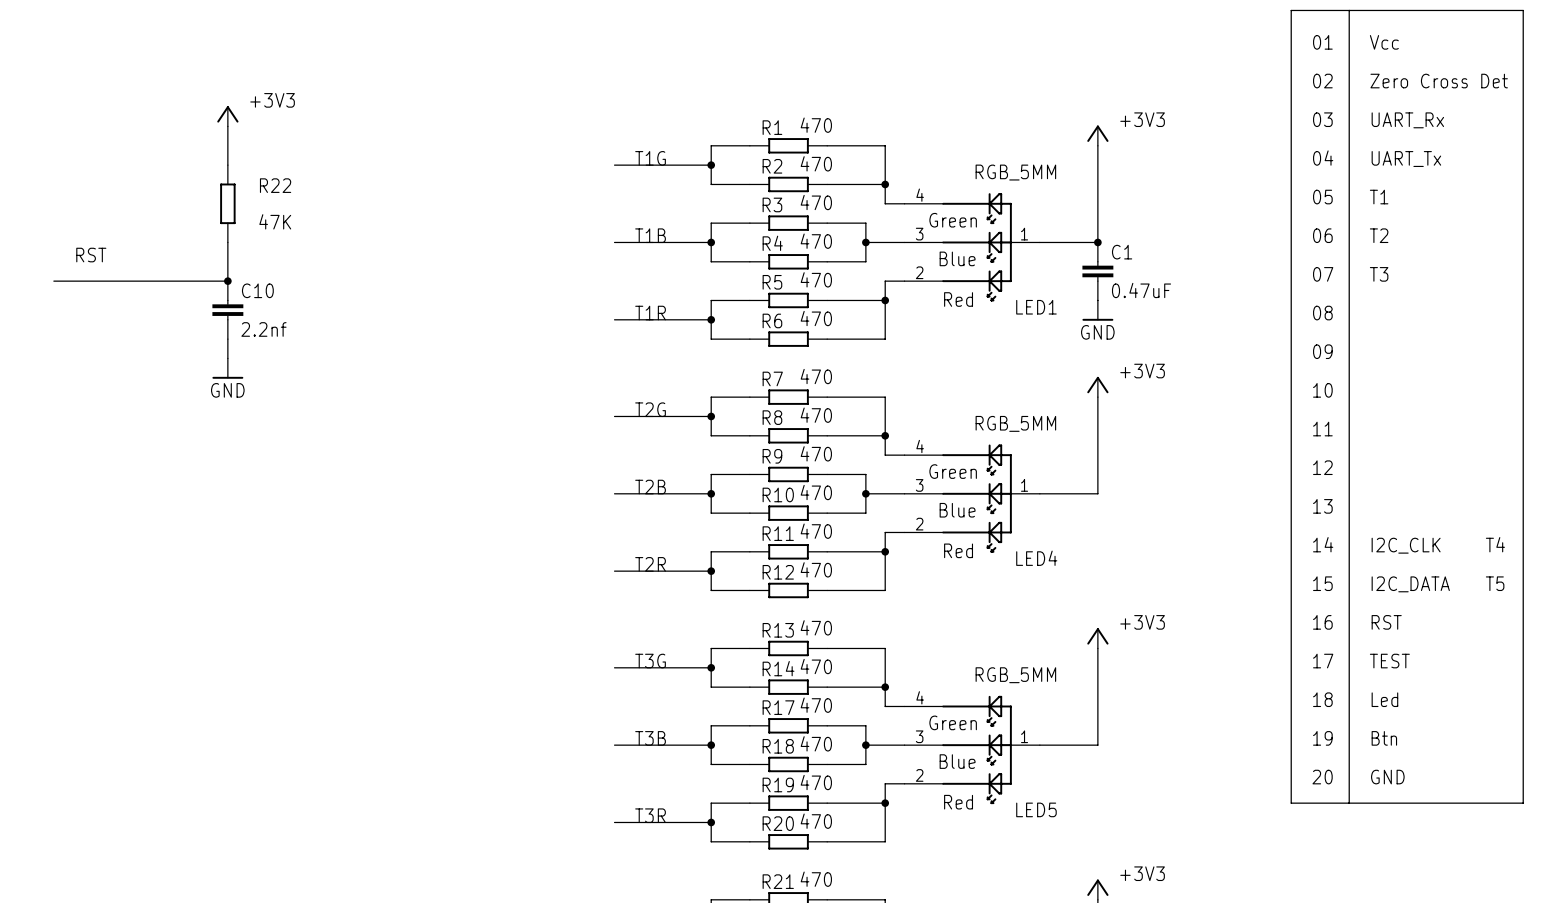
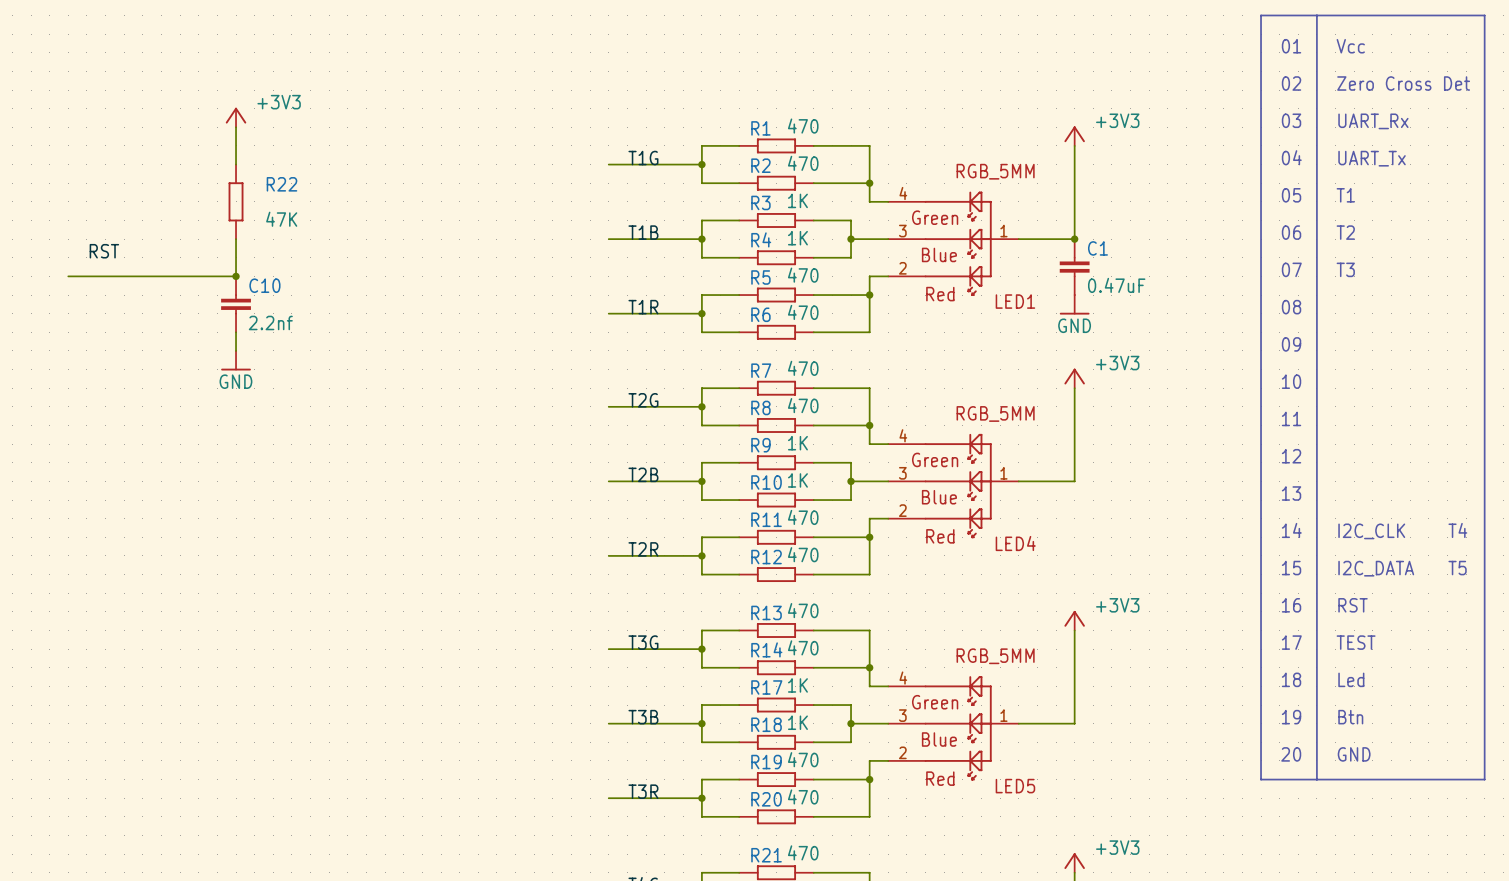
R3 value: 470 (816, 202) -> 1K (797, 200)
R4 value: 470 (816, 241) -> 1K (797, 238)
R9 value: 470 (816, 453) -> 1K (797, 443)
R10 value: 470 (816, 492) -> 1K (797, 480)
R17 value: 470 (816, 705) -> 1K (797, 685)
R18 value: 470 (816, 743) -> 1K (797, 722)

